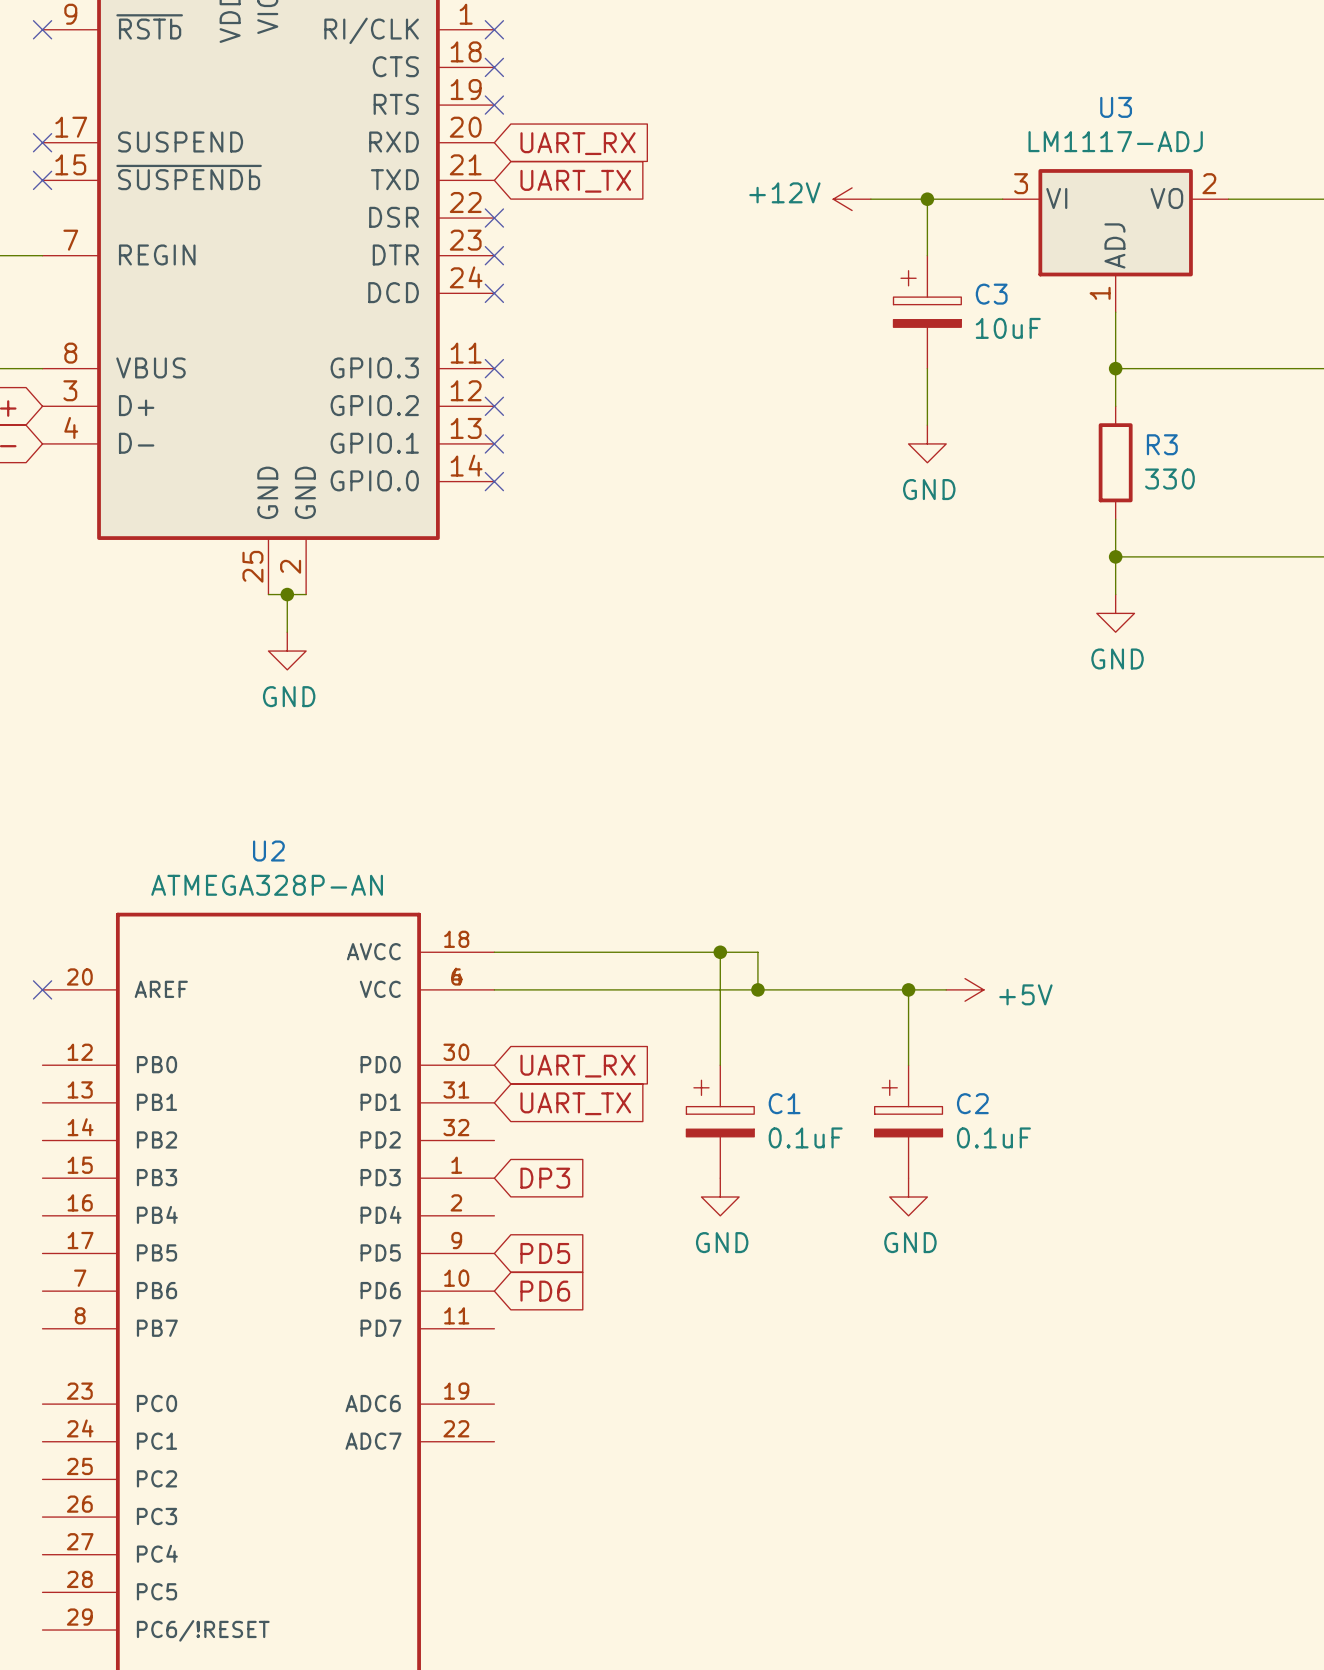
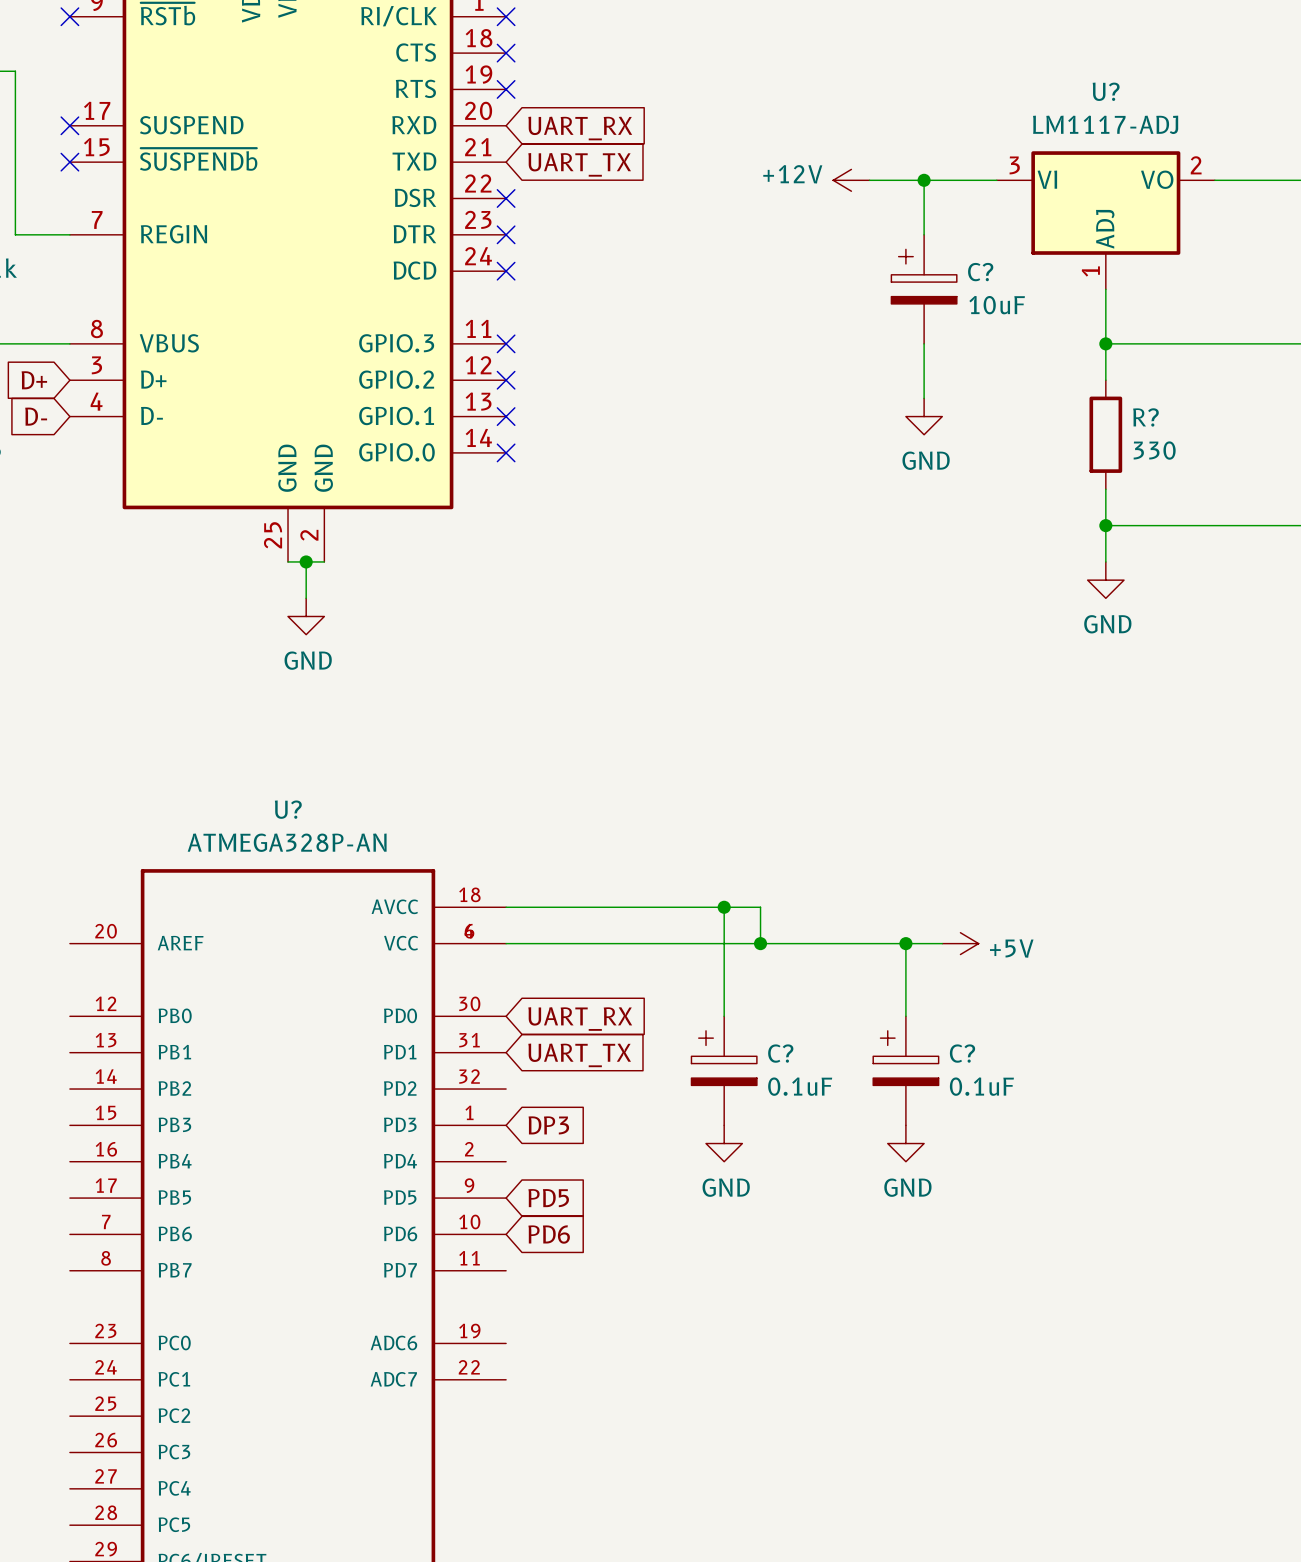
U3 name: U3 (1116, 107) -> U? (1106, 91)
C3 name: C3 (991, 294) -> C? (980, 272)
R3 name: R3 (1162, 444) -> R? (1145, 417)
U2 name: U2 (268, 851) -> U? (288, 809)
no-connect mark: (42, 989) -> none
C1 name: C1 (784, 1103) -> C? (780, 1053)
C2 name: C2 (972, 1103) -> C? (962, 1053)

